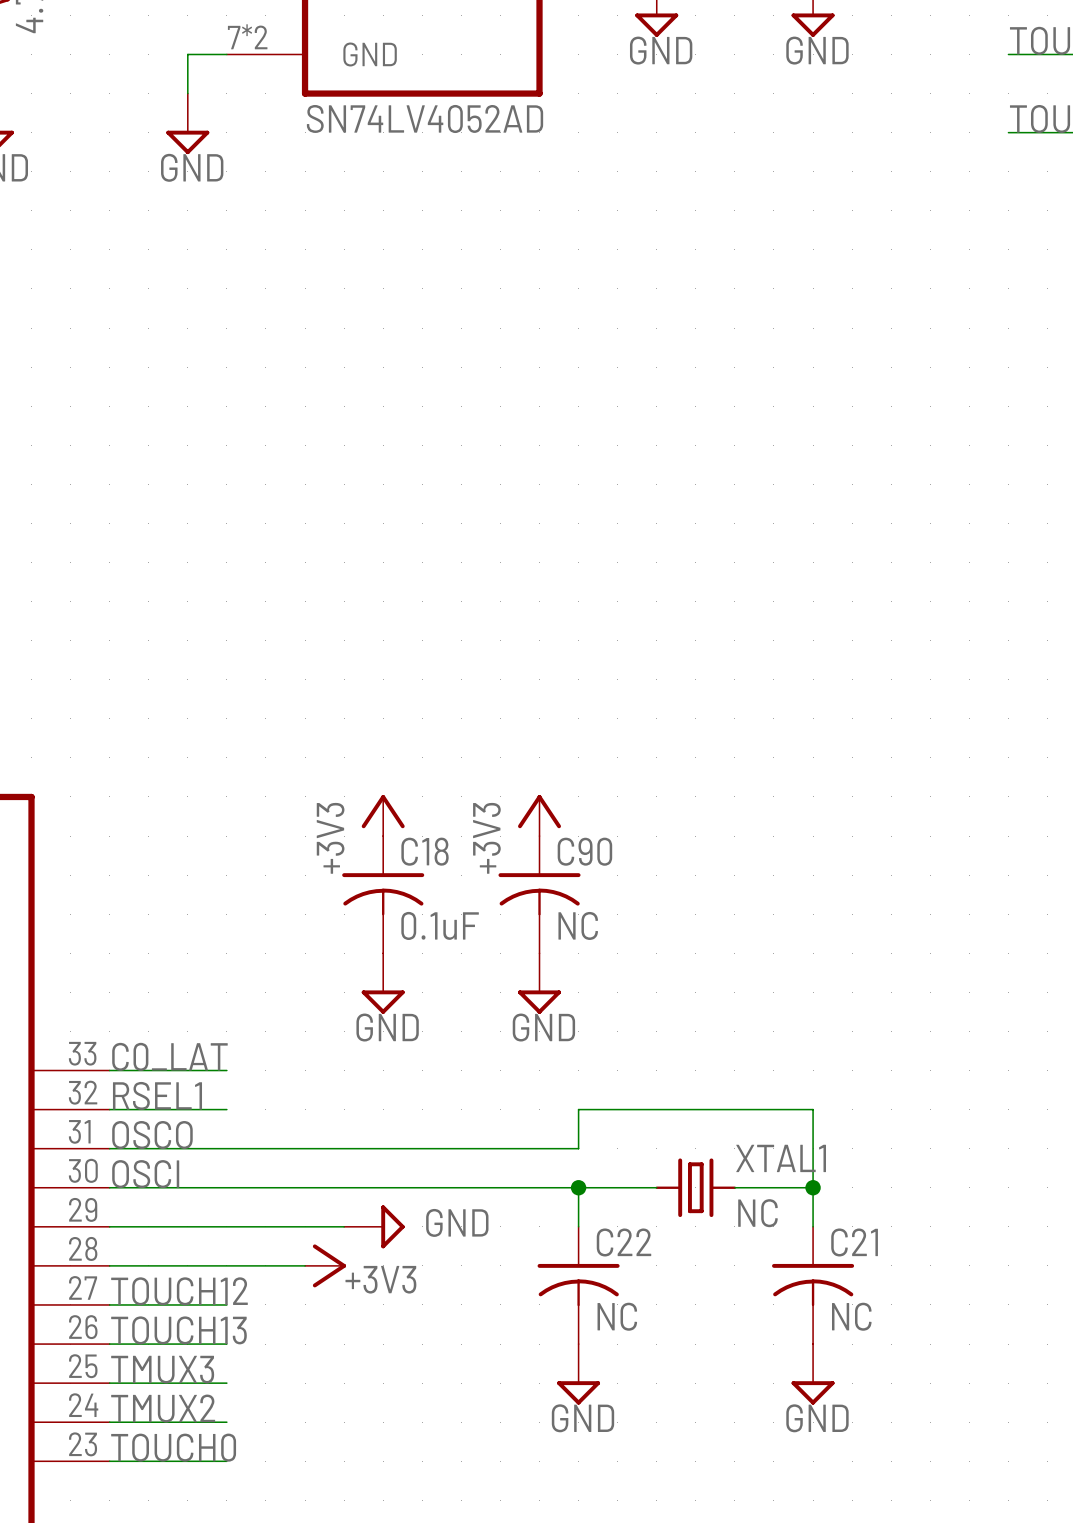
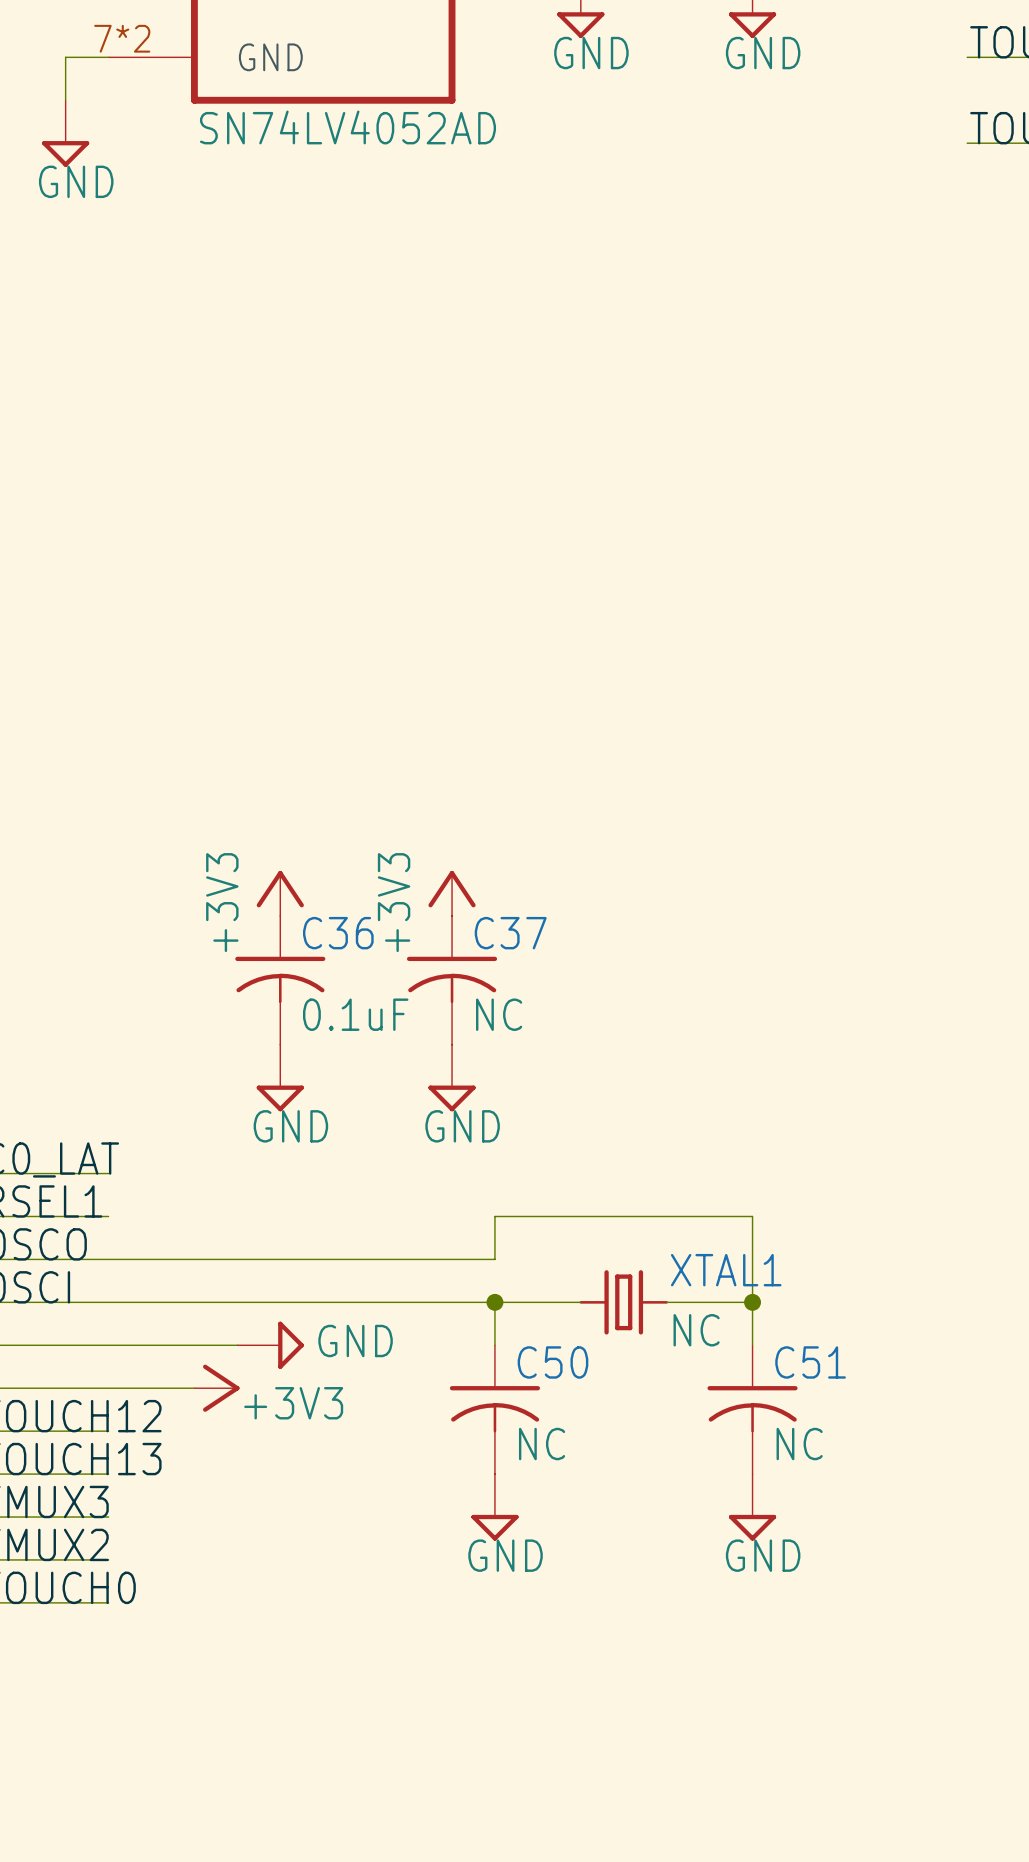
C18 name: C18 (425, 851) -> C36 (338, 933)
C90 name: C90 (584, 851) -> C37 (510, 933)
C22 name: C22 (623, 1242) -> C50 (552, 1362)
C21 name: C21 (854, 1242) -> C51 (810, 1362)

